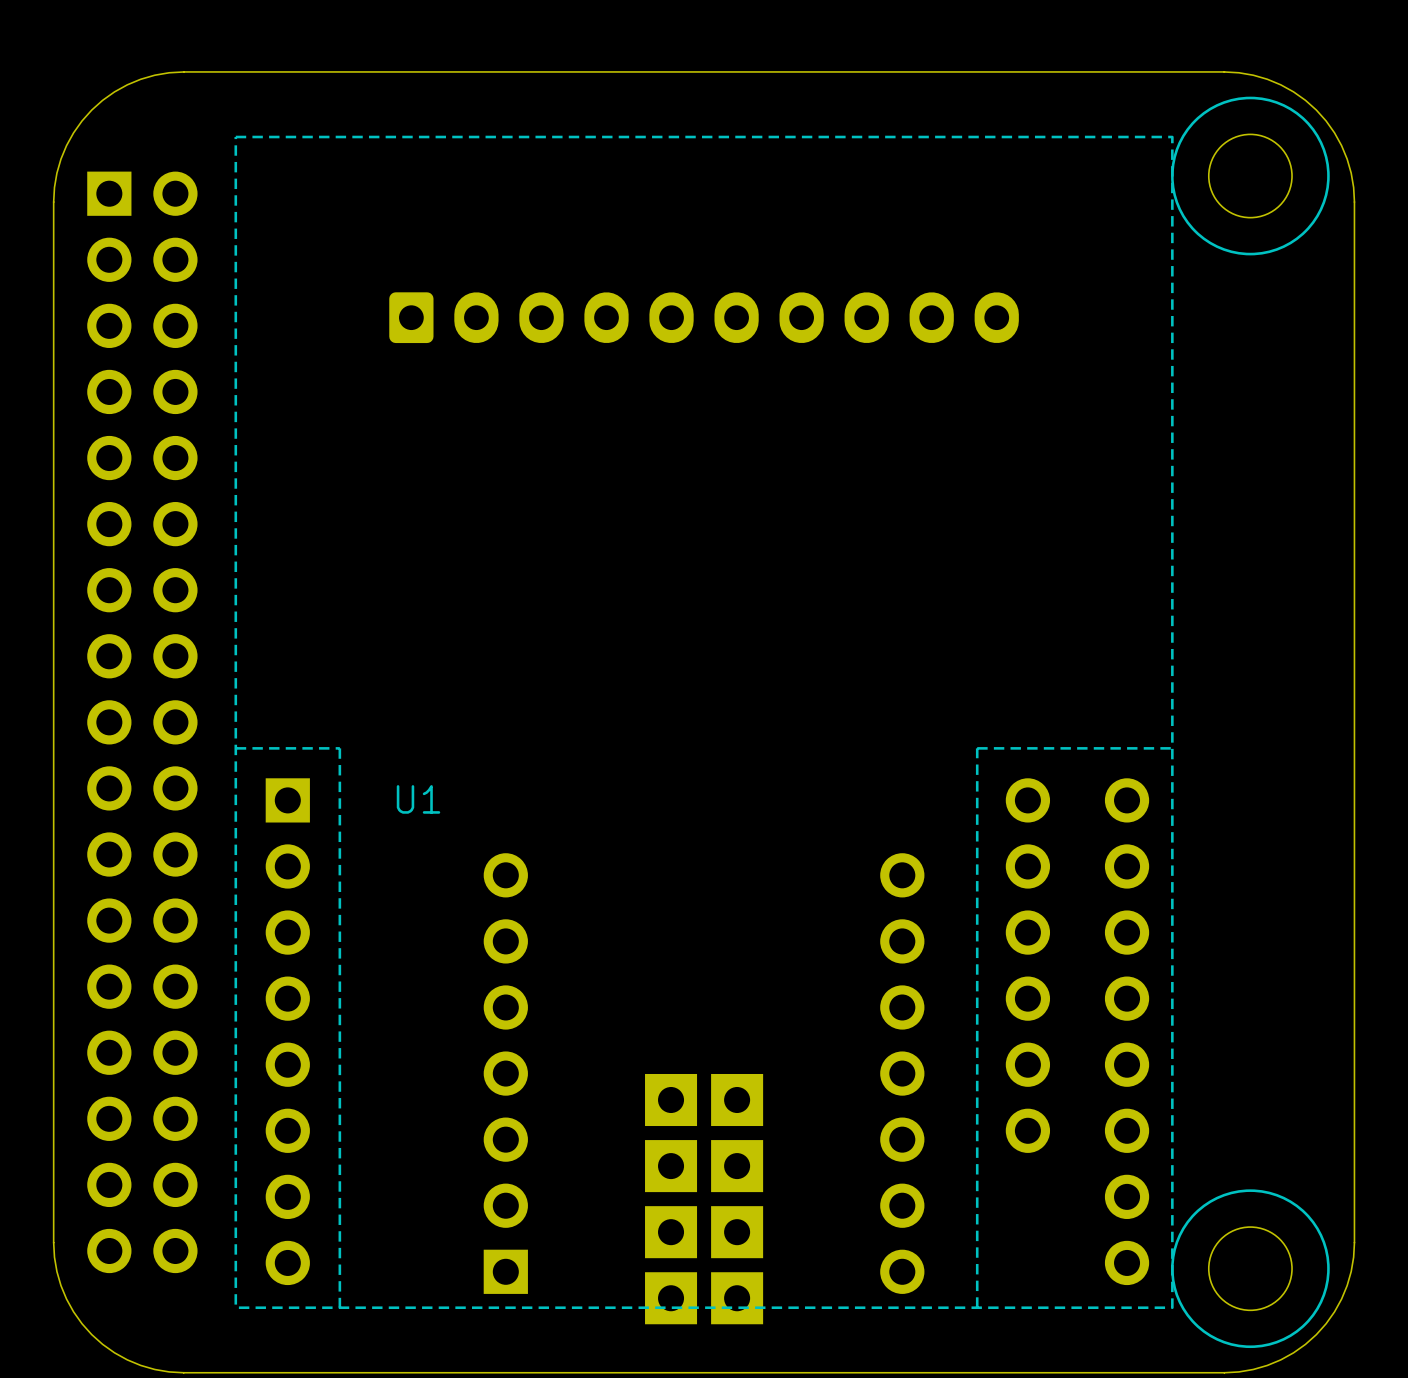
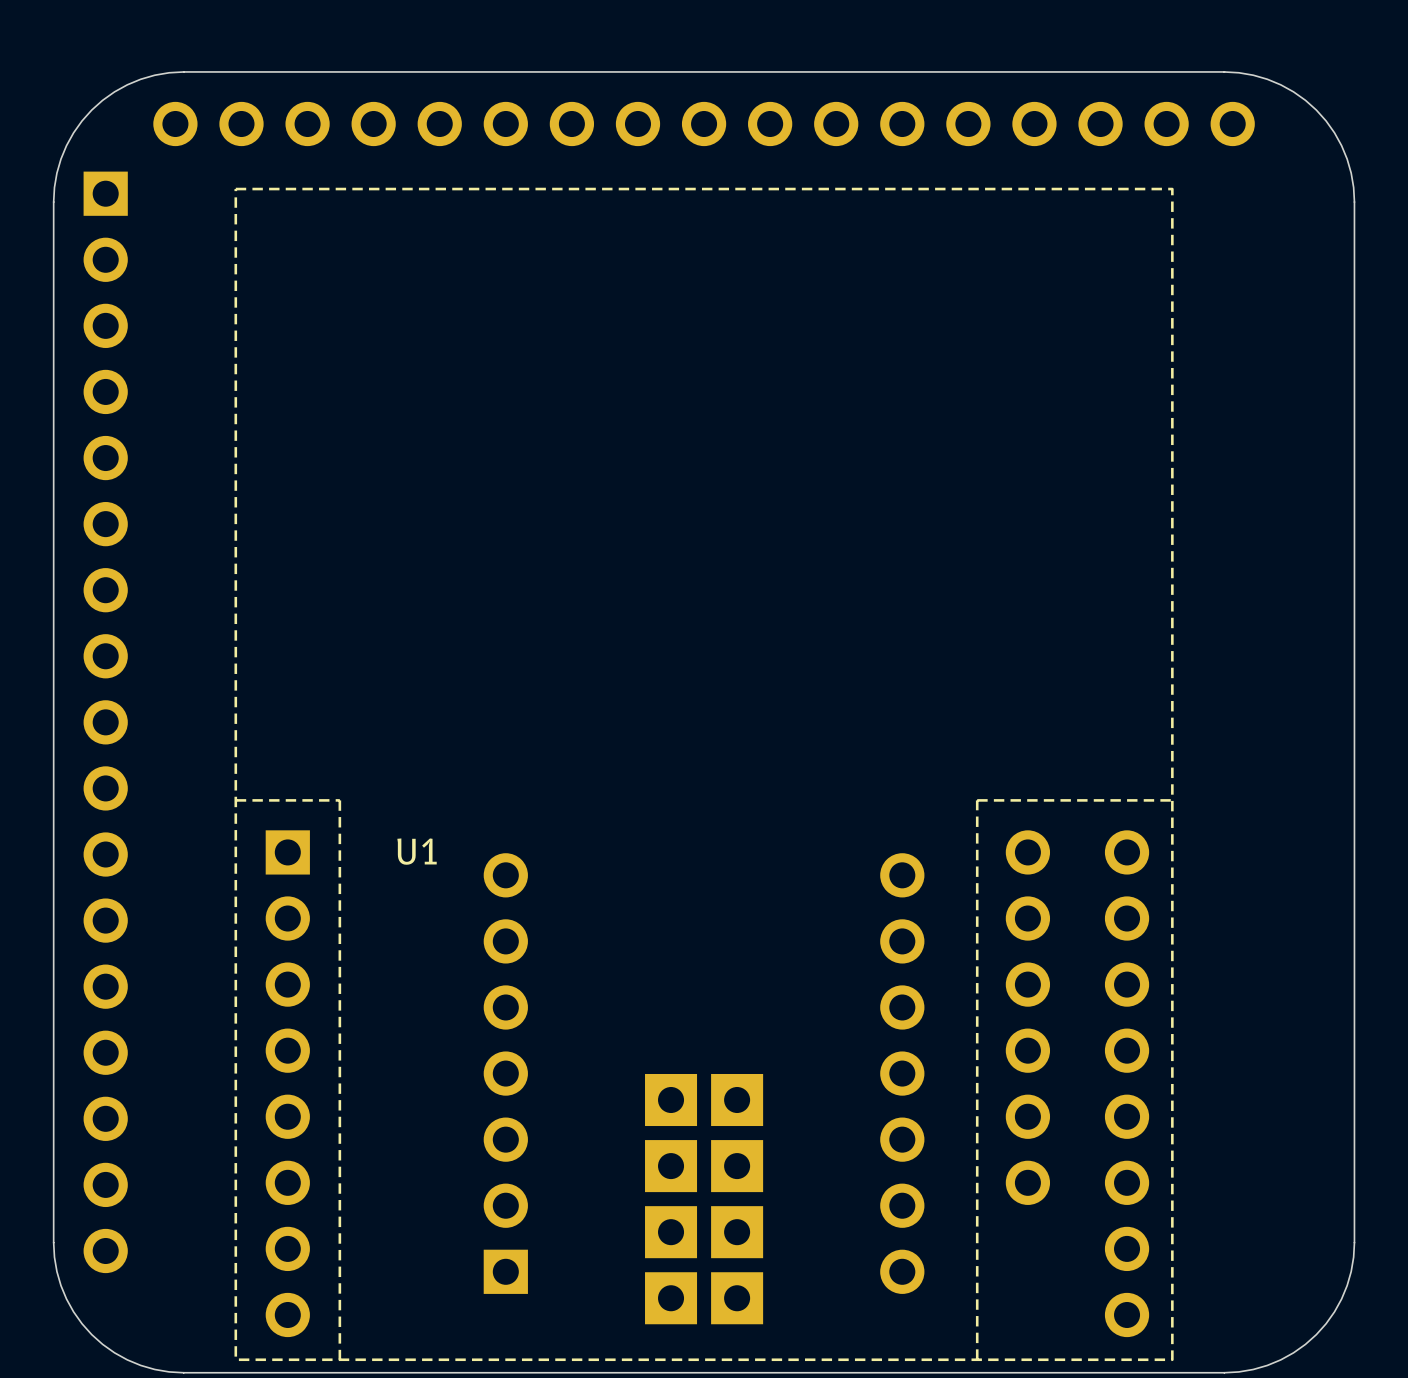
part footprint: [53, 71, 1356, 1374] -> [53, 71, 1356, 1374]
part: (704, 317) -> none
U1 position: (704, 722) -> (704, 774)

